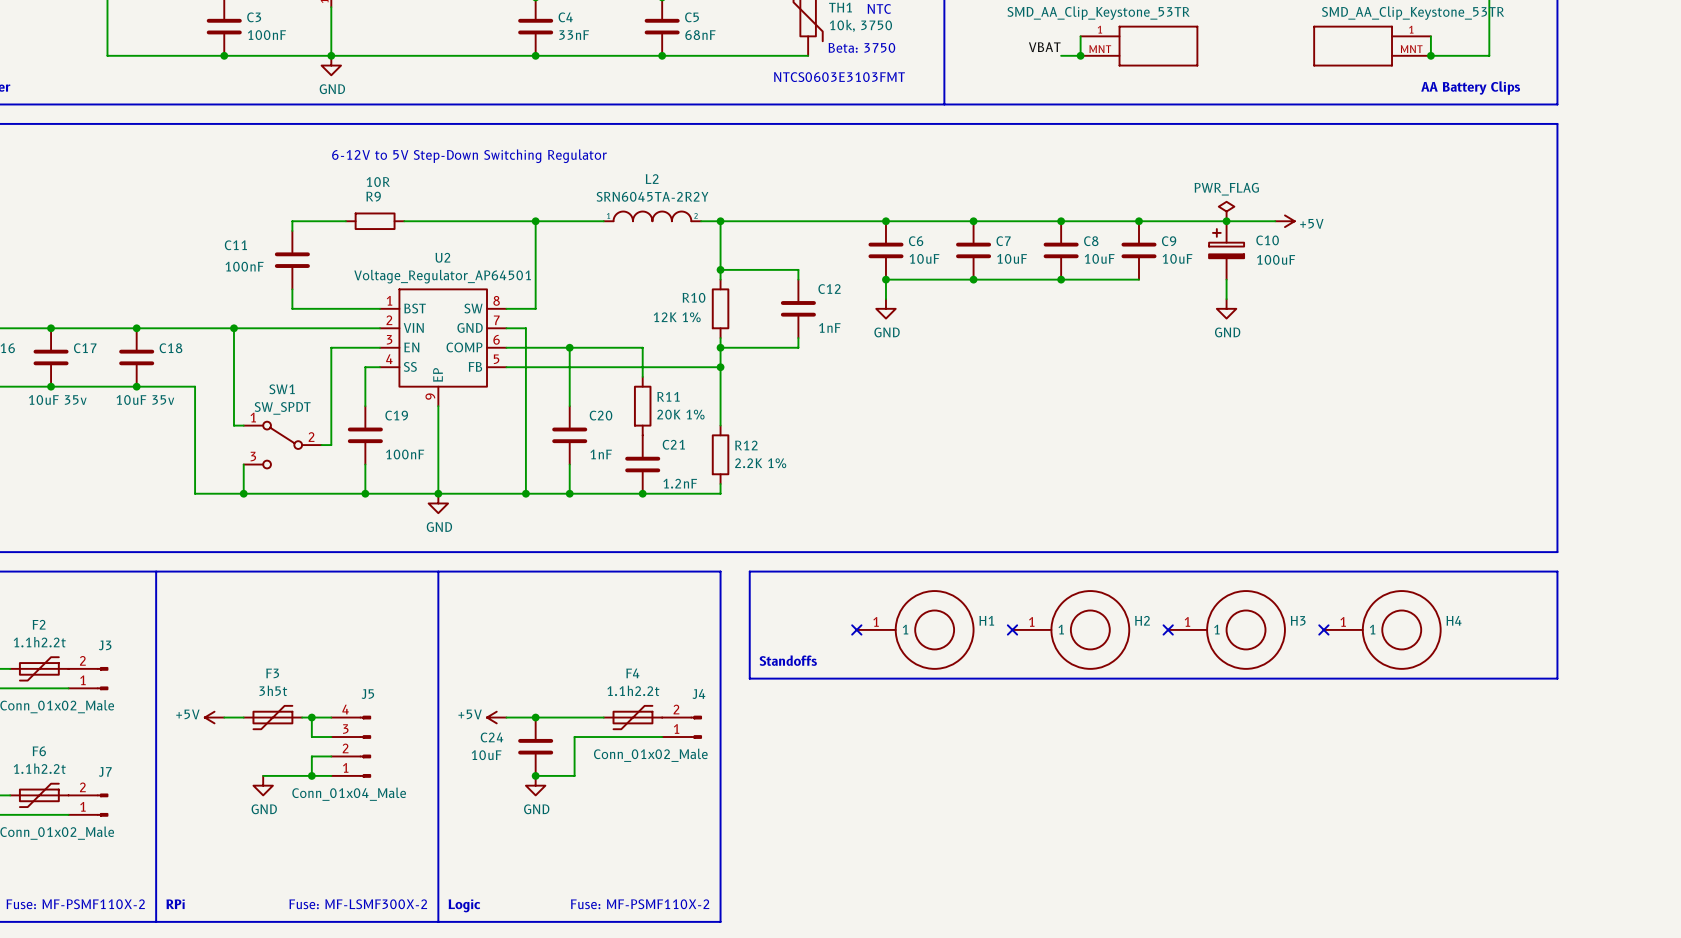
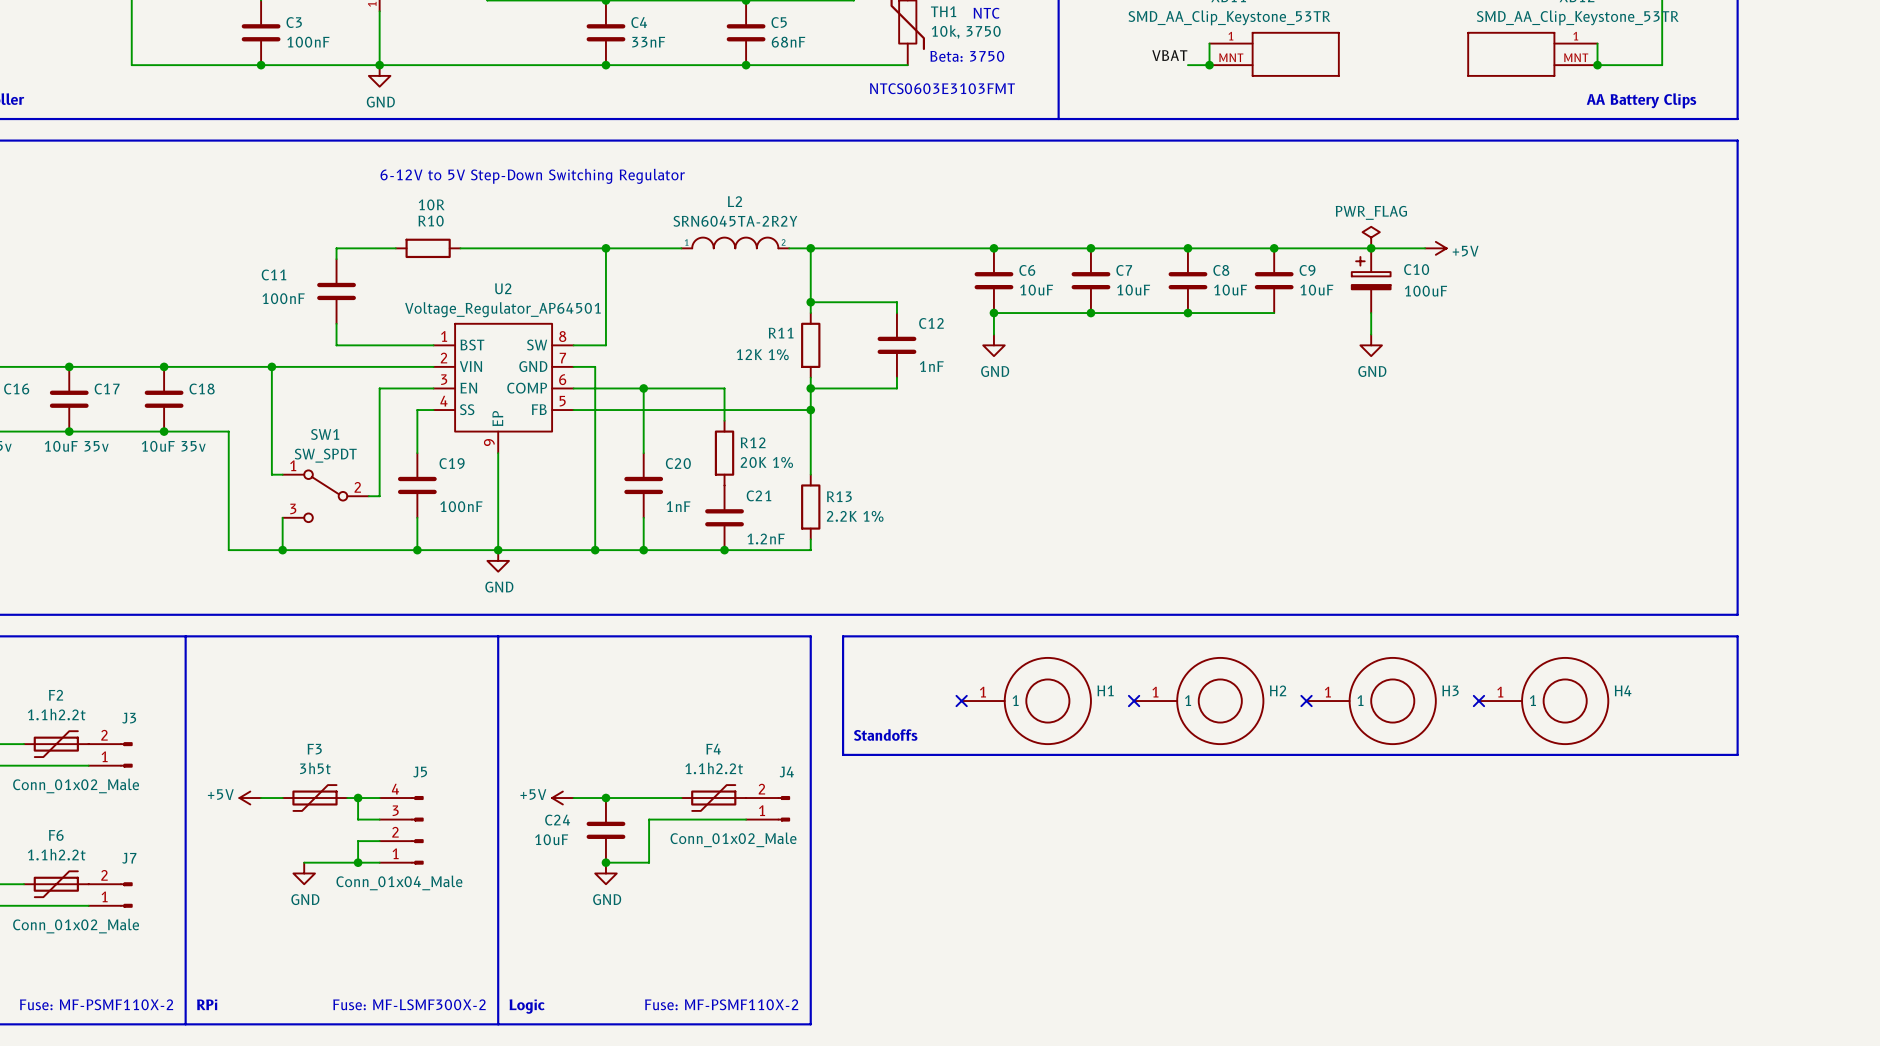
R9 name: R9 (373, 196) -> R10 (431, 221)
R10 name: R10 (694, 297) -> R11 (781, 333)
R11 name: R11 (668, 396) -> R12 (753, 442)
R12 name: R12 (746, 445) -> R13 (839, 496)

